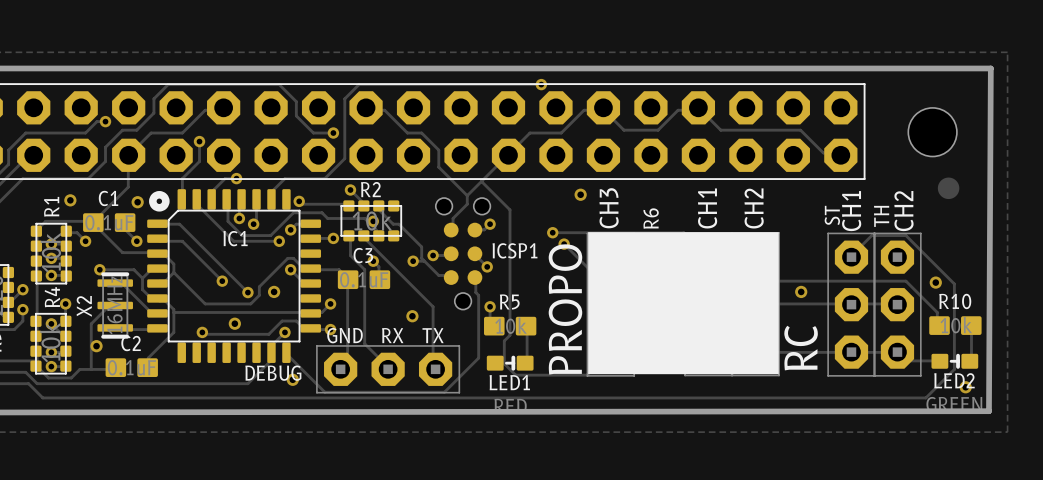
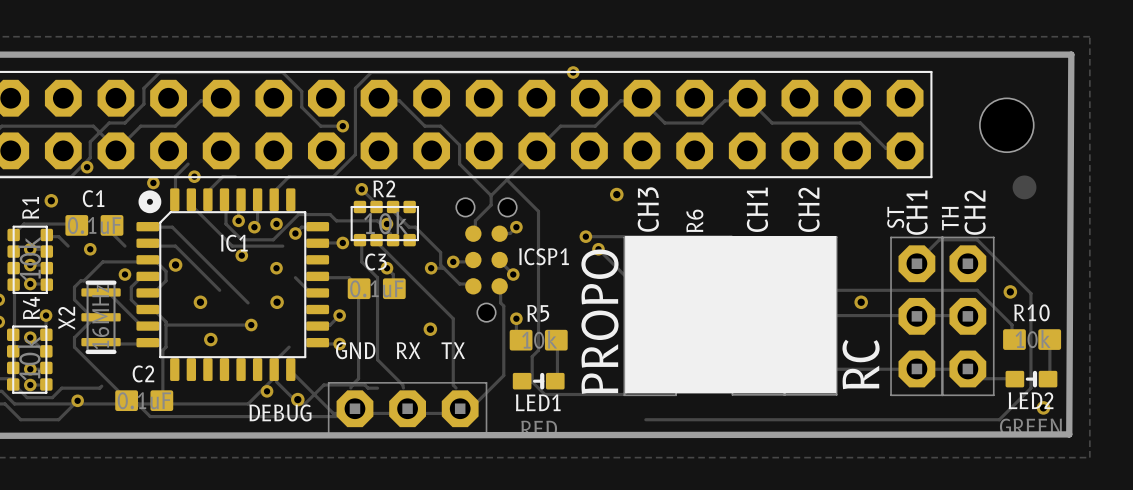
track: (105, 121) (96, 121) (85, 133) -> (115, 150) (93, 126) (68, 126)
via: (105, 121) -> none
track: (199, 141) (199, 161) (193, 167) -> none
via: (199, 141) -> none
track: (128, 155) (128, 187) (93, 222) (122, 252) (157, 253) -> (101, 317) (93, 318) (74, 299) (74, 287) (80, 280) (83, 280) (102, 261) (147, 261) (147, 259)
via: none -> (87, 167)
via: none -> (194, 176)
via: (236, 178) -> none
via: none -> (153, 182)
track: (299, 201) (302, 204) (347, 204) (348, 205) -> none
via: (299, 201) -> none
via: (137, 202) -> none
via: none -> (276, 224)
via: (85, 241) -> none
via: (136, 241) -> none
via: (279, 241) -> none
via: none -> (90, 249)
via: none -> (241, 255)
via: none -> (175, 264)
via: none -> (276, 268)
via: none -> (124, 274)
track: (310, 268) (310, 266) (302, 266) (293, 258) (287, 258) (259, 286) (259, 295) (250, 303) (205, 303) (173, 272) -> none
track: (99, 269) (133, 269) (142, 278) -> none
via: (99, 269) -> none
via: (290, 269) -> none
via: (222, 281) -> none
via: none -> (200, 302)
via: (247, 292) -> none
track: (250, 312) (310, 313) -> none
via: none -> (251, 325)
via position: (234, 323) -> (210, 339)
track: (310, 328) (310, 326) (302, 326) (296, 321) (282, 321) (268, 334) (204, 334) (202, 332) -> none
track: (91, 332) (91, 369) -> (74, 347) (126, 400) (134, 400) (150, 416) (345, 416) (354, 408)
via: (202, 332) -> none
via: (284, 332) -> none
track: (171, 335) (148, 358) (147, 367) -> (162, 350) (161, 400)
via: (96, 346) -> none
track: none -> (276, 381) (298, 403) (304, 403) (323, 385) (364, 385) (368, 388) (377, 388)
C2 position: (131, 367) -> (144, 400)
DEBUG position: (388, 369) -> (407, 408)
via: none -> (267, 391)
via: none -> (77, 400)
track: (77, 397) (606, 397) -> (58, 419) (77, 400)

